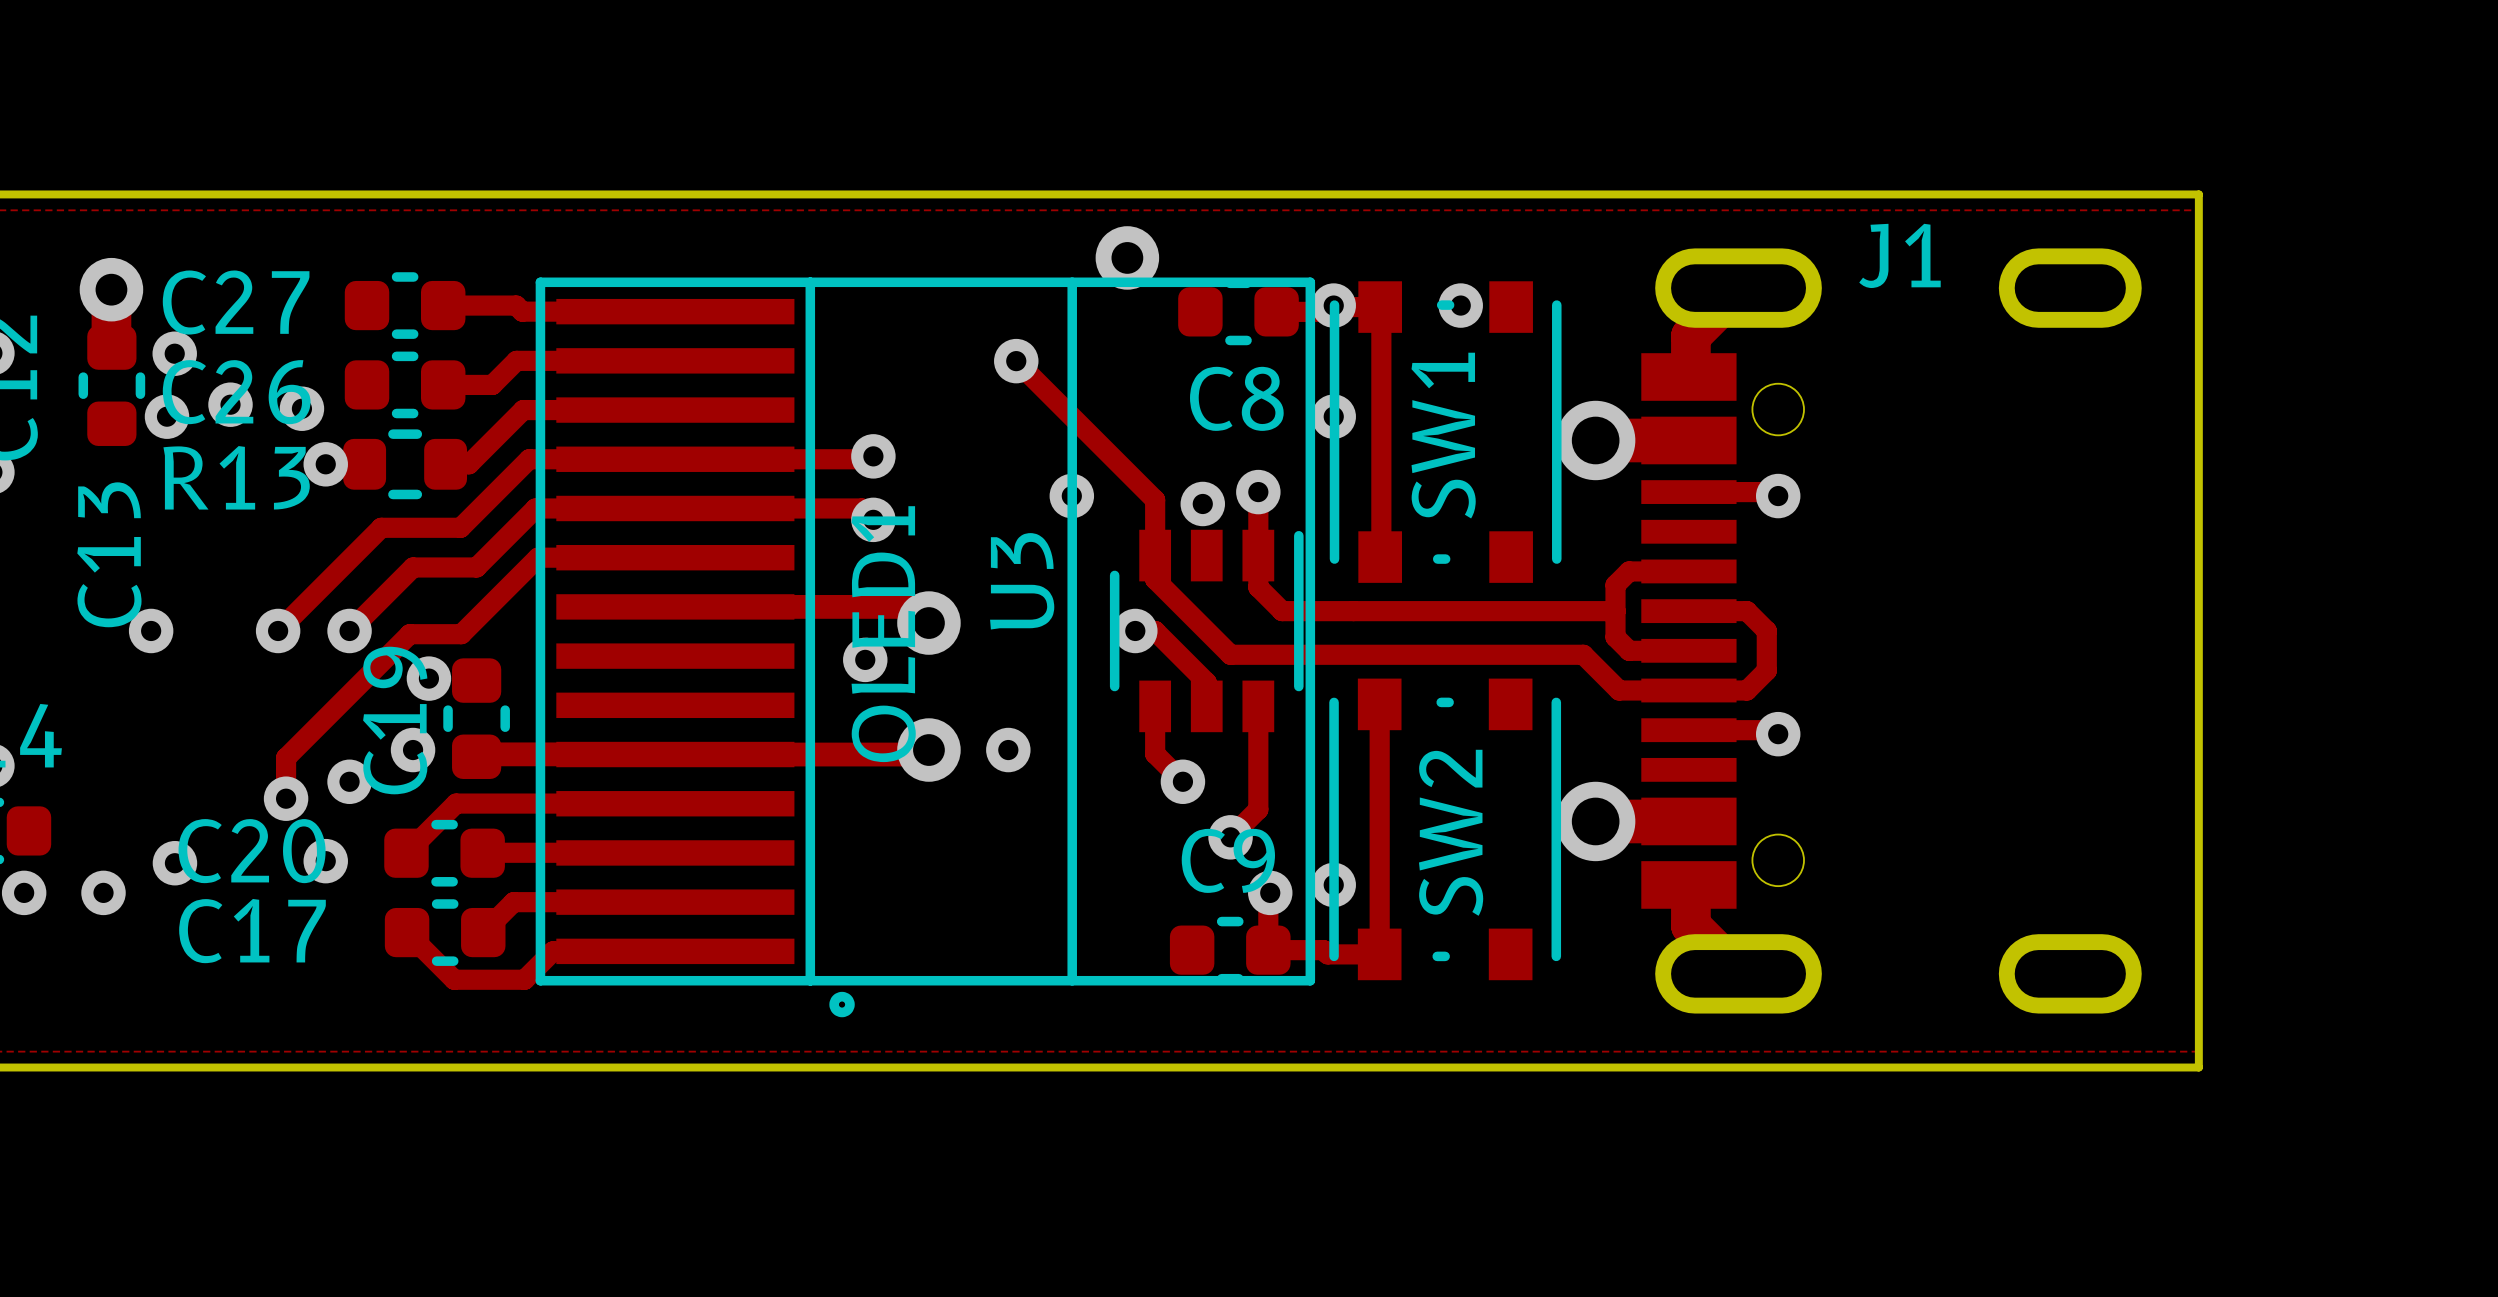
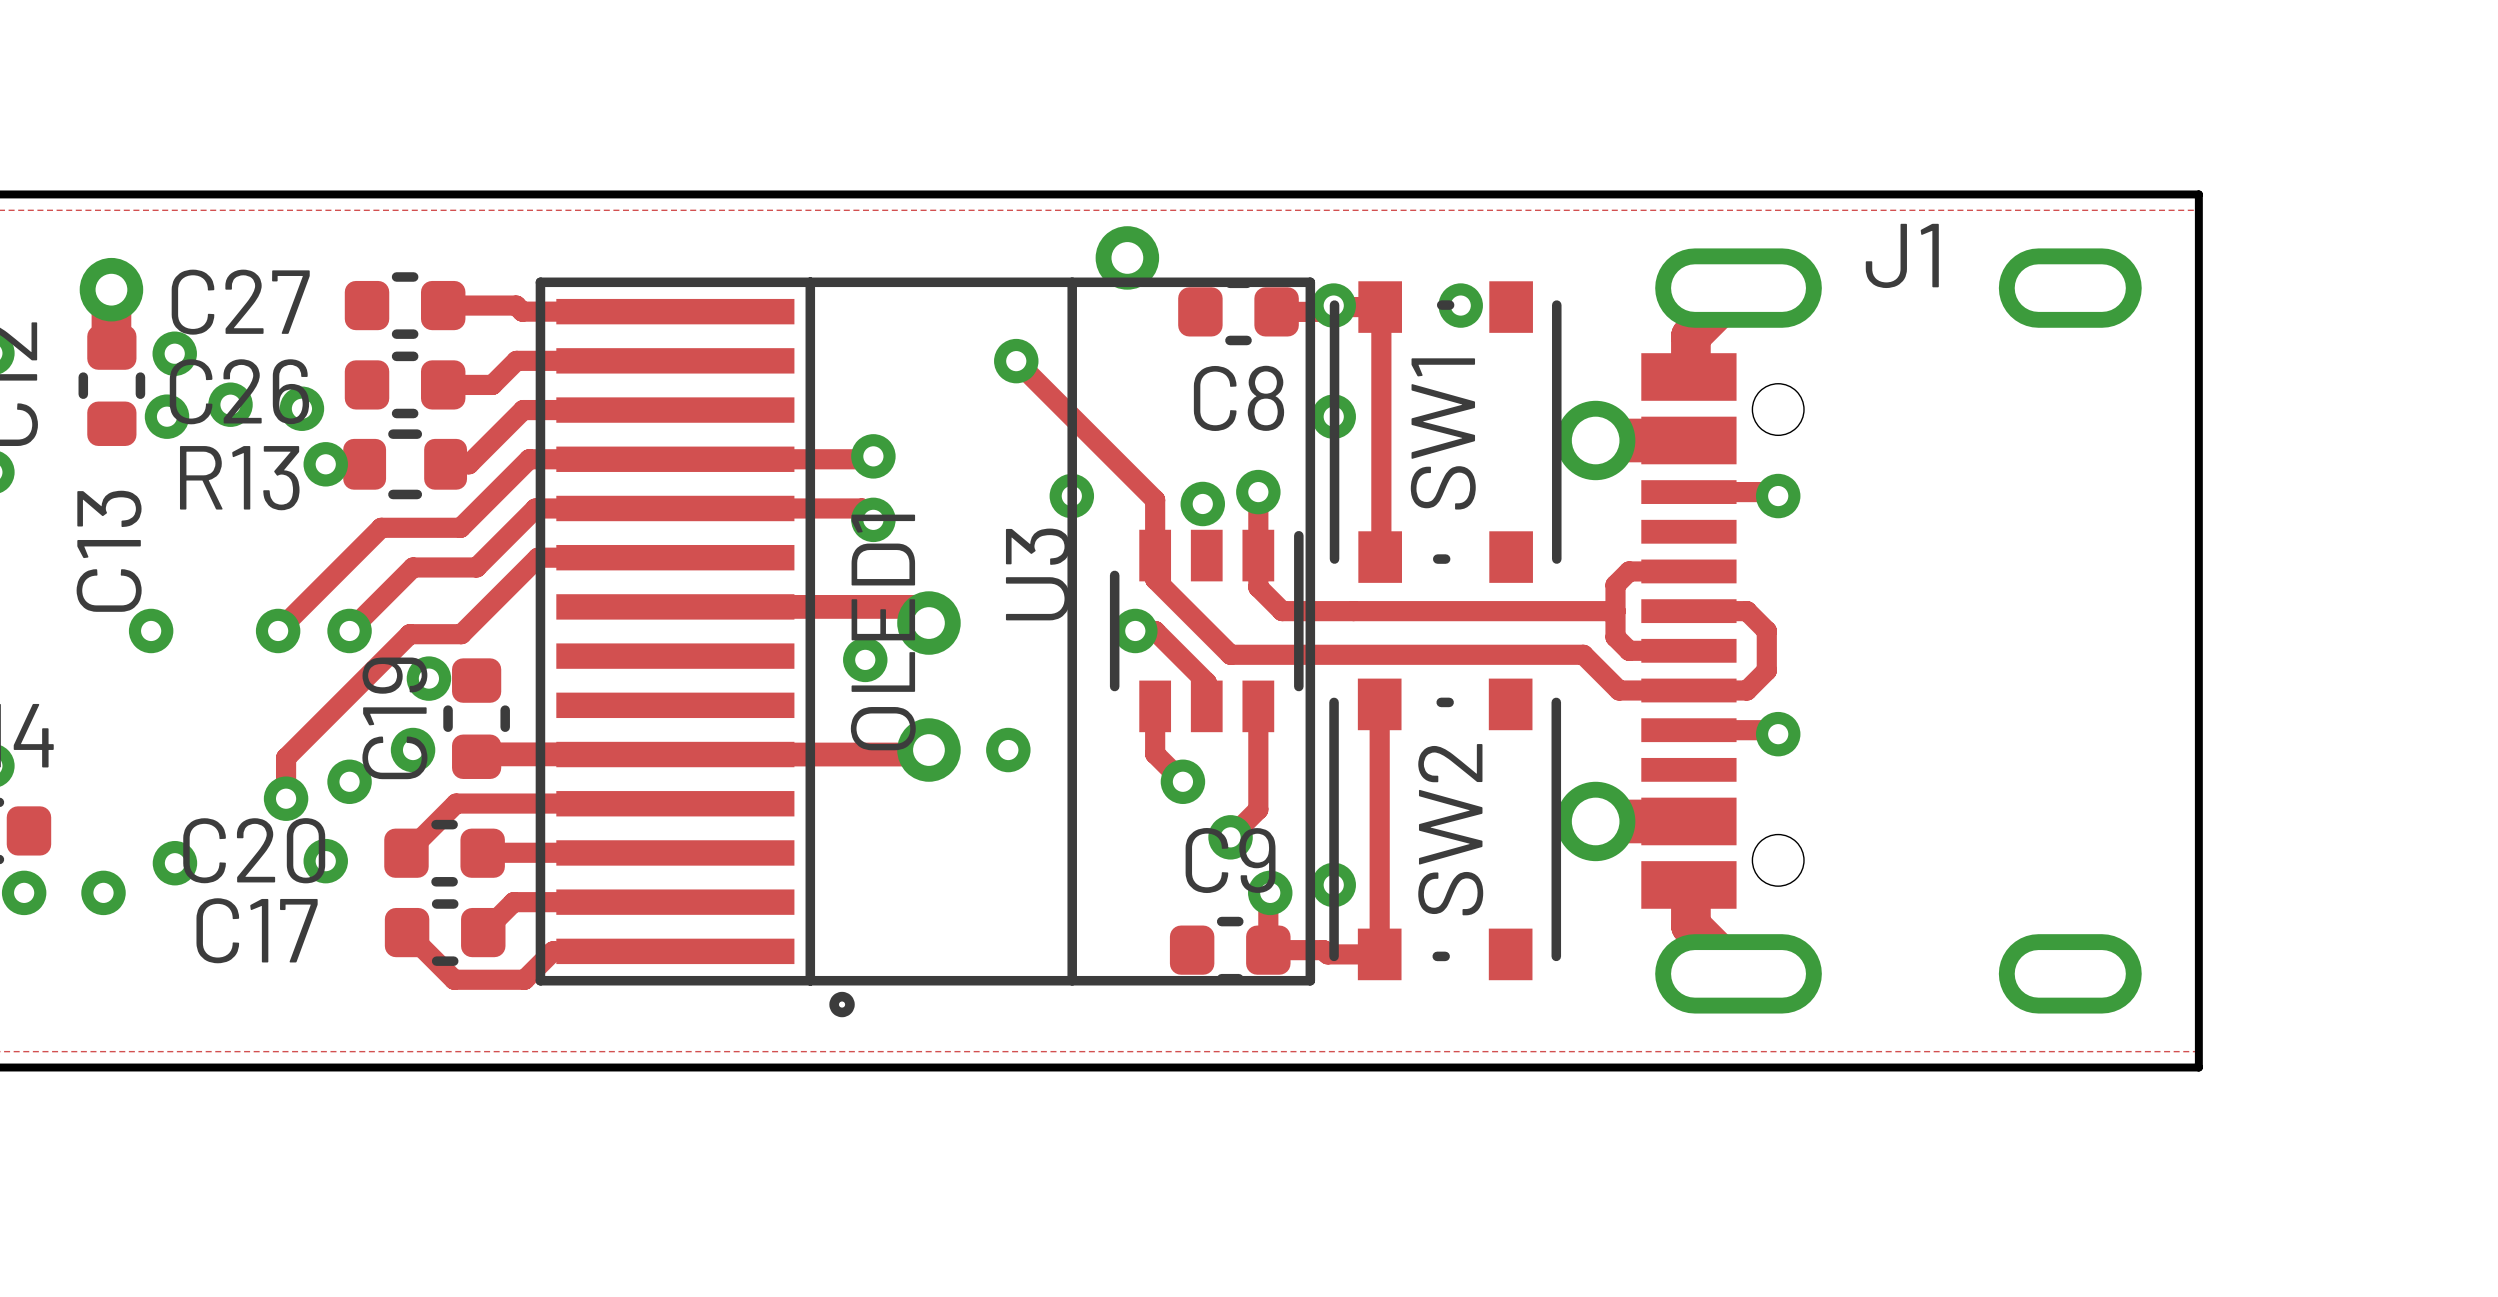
U3 name position: U3 (1022, 581) -> U3 (1038, 574)

